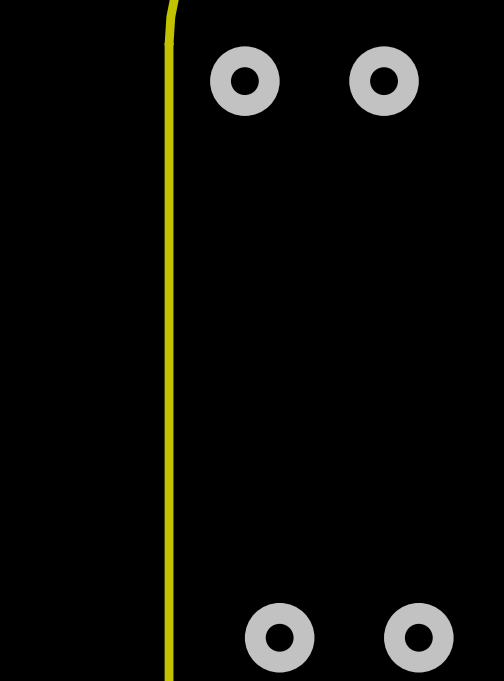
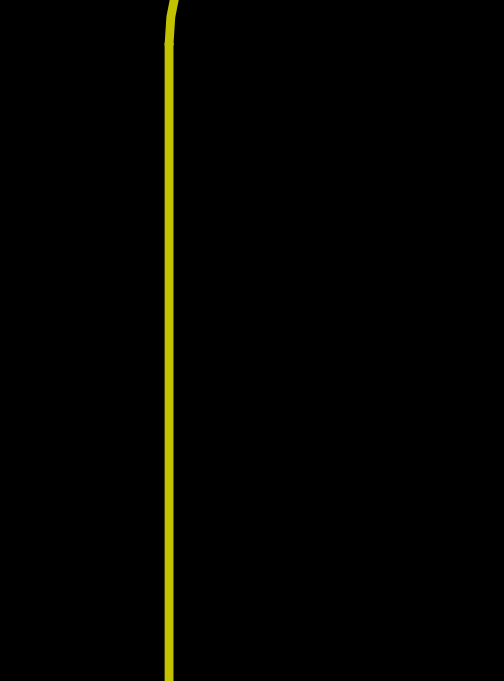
via: (244, 81) -> none
via: (384, 81) -> none
via: (279, 637) -> none
via: (418, 637) -> none

